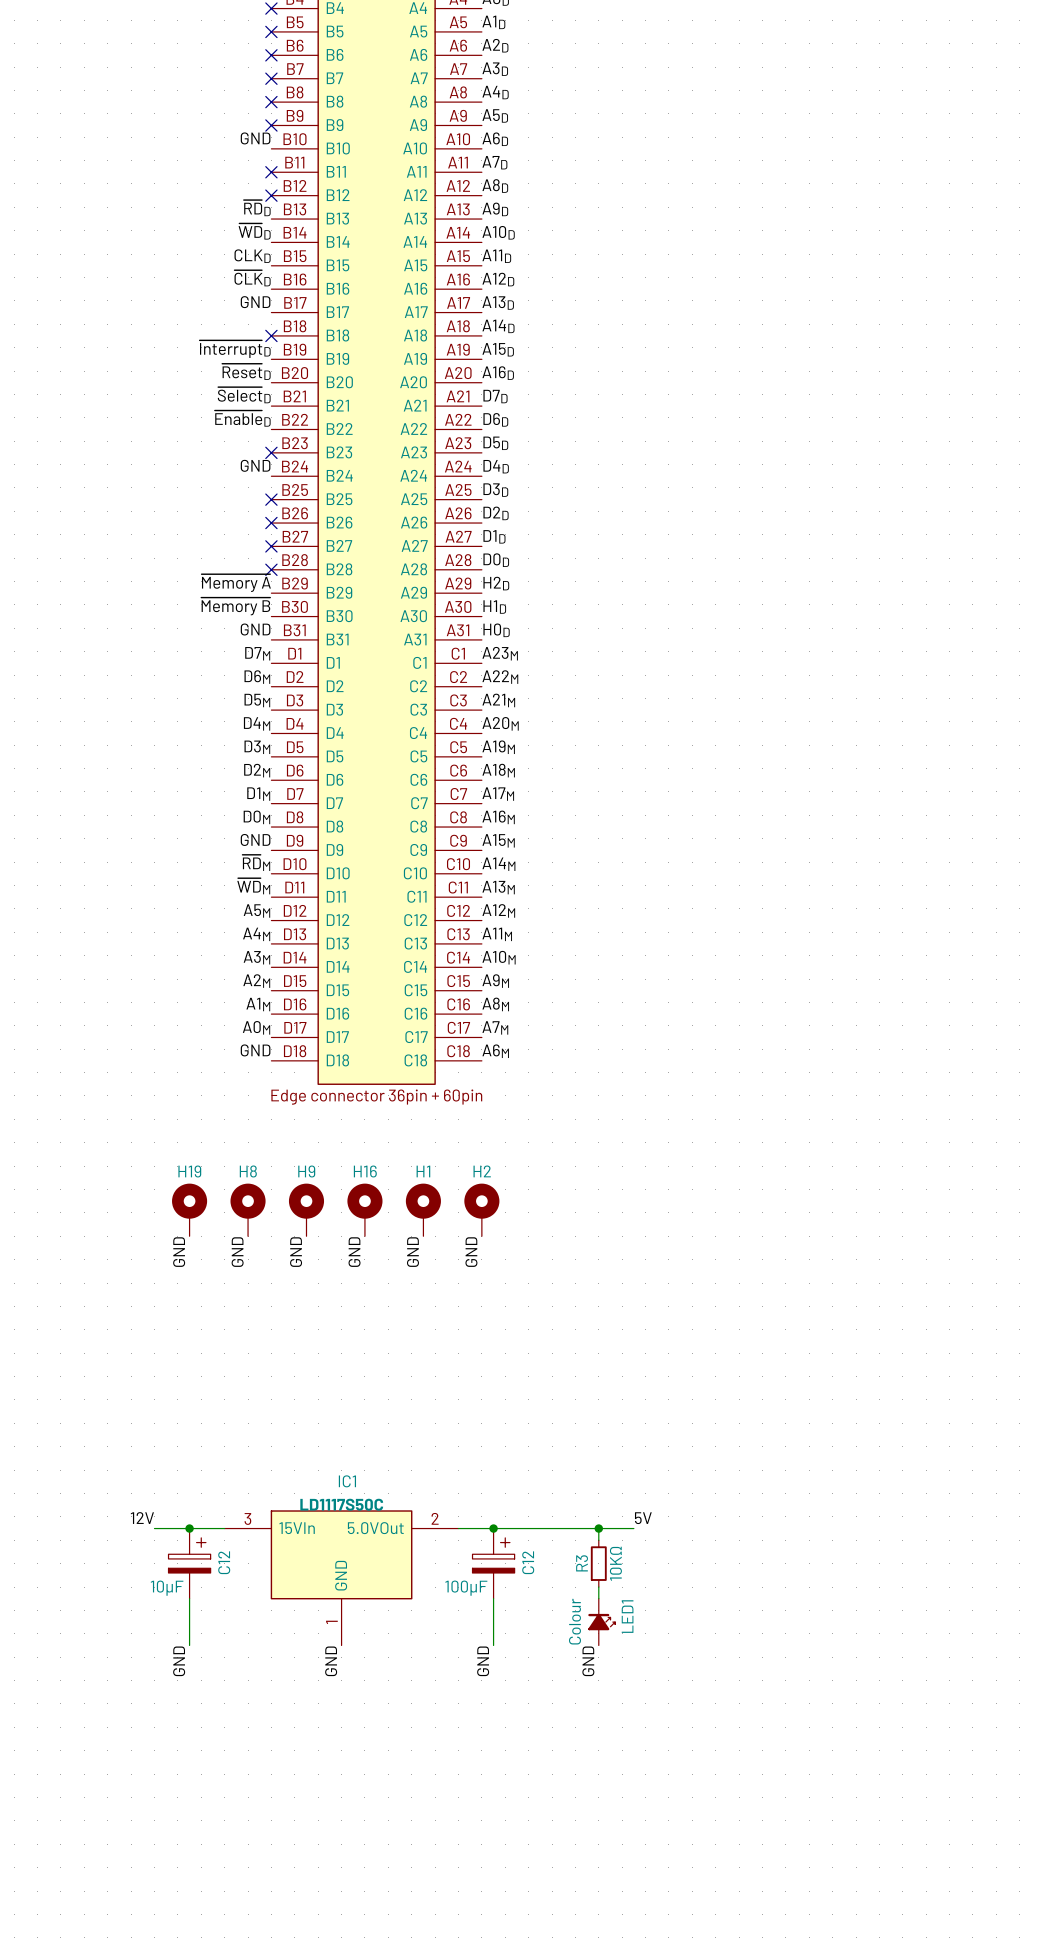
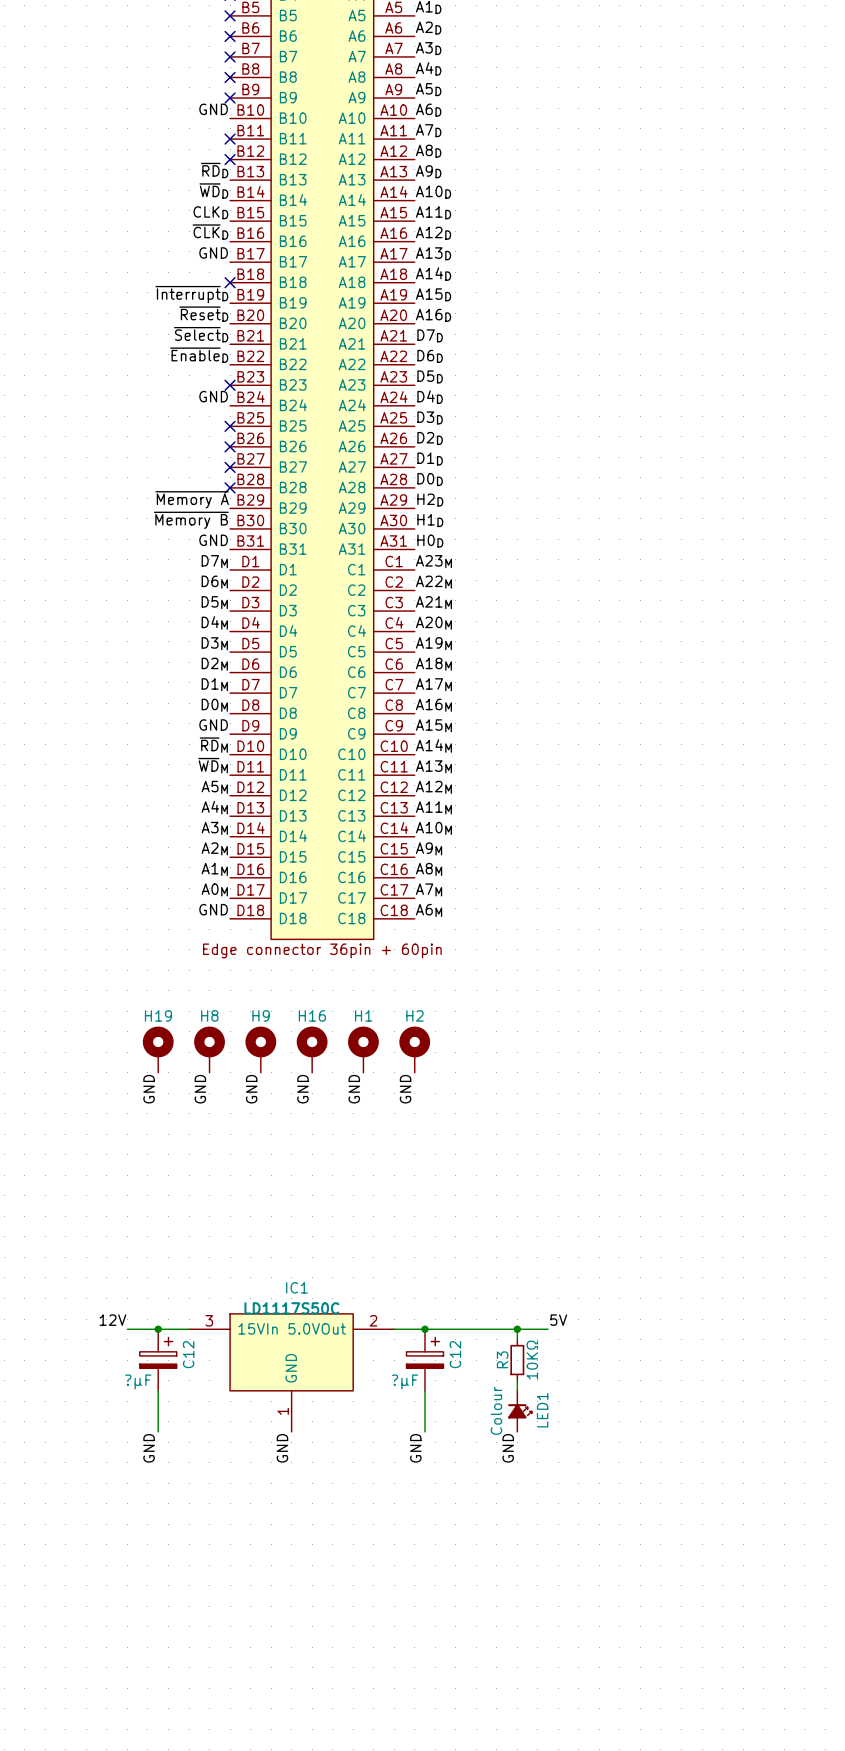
C12 text: 10μF (167, 1588) -> ?μF (138, 1381)
C12 text: 100μF (466, 1588) -> ?μF (405, 1381)

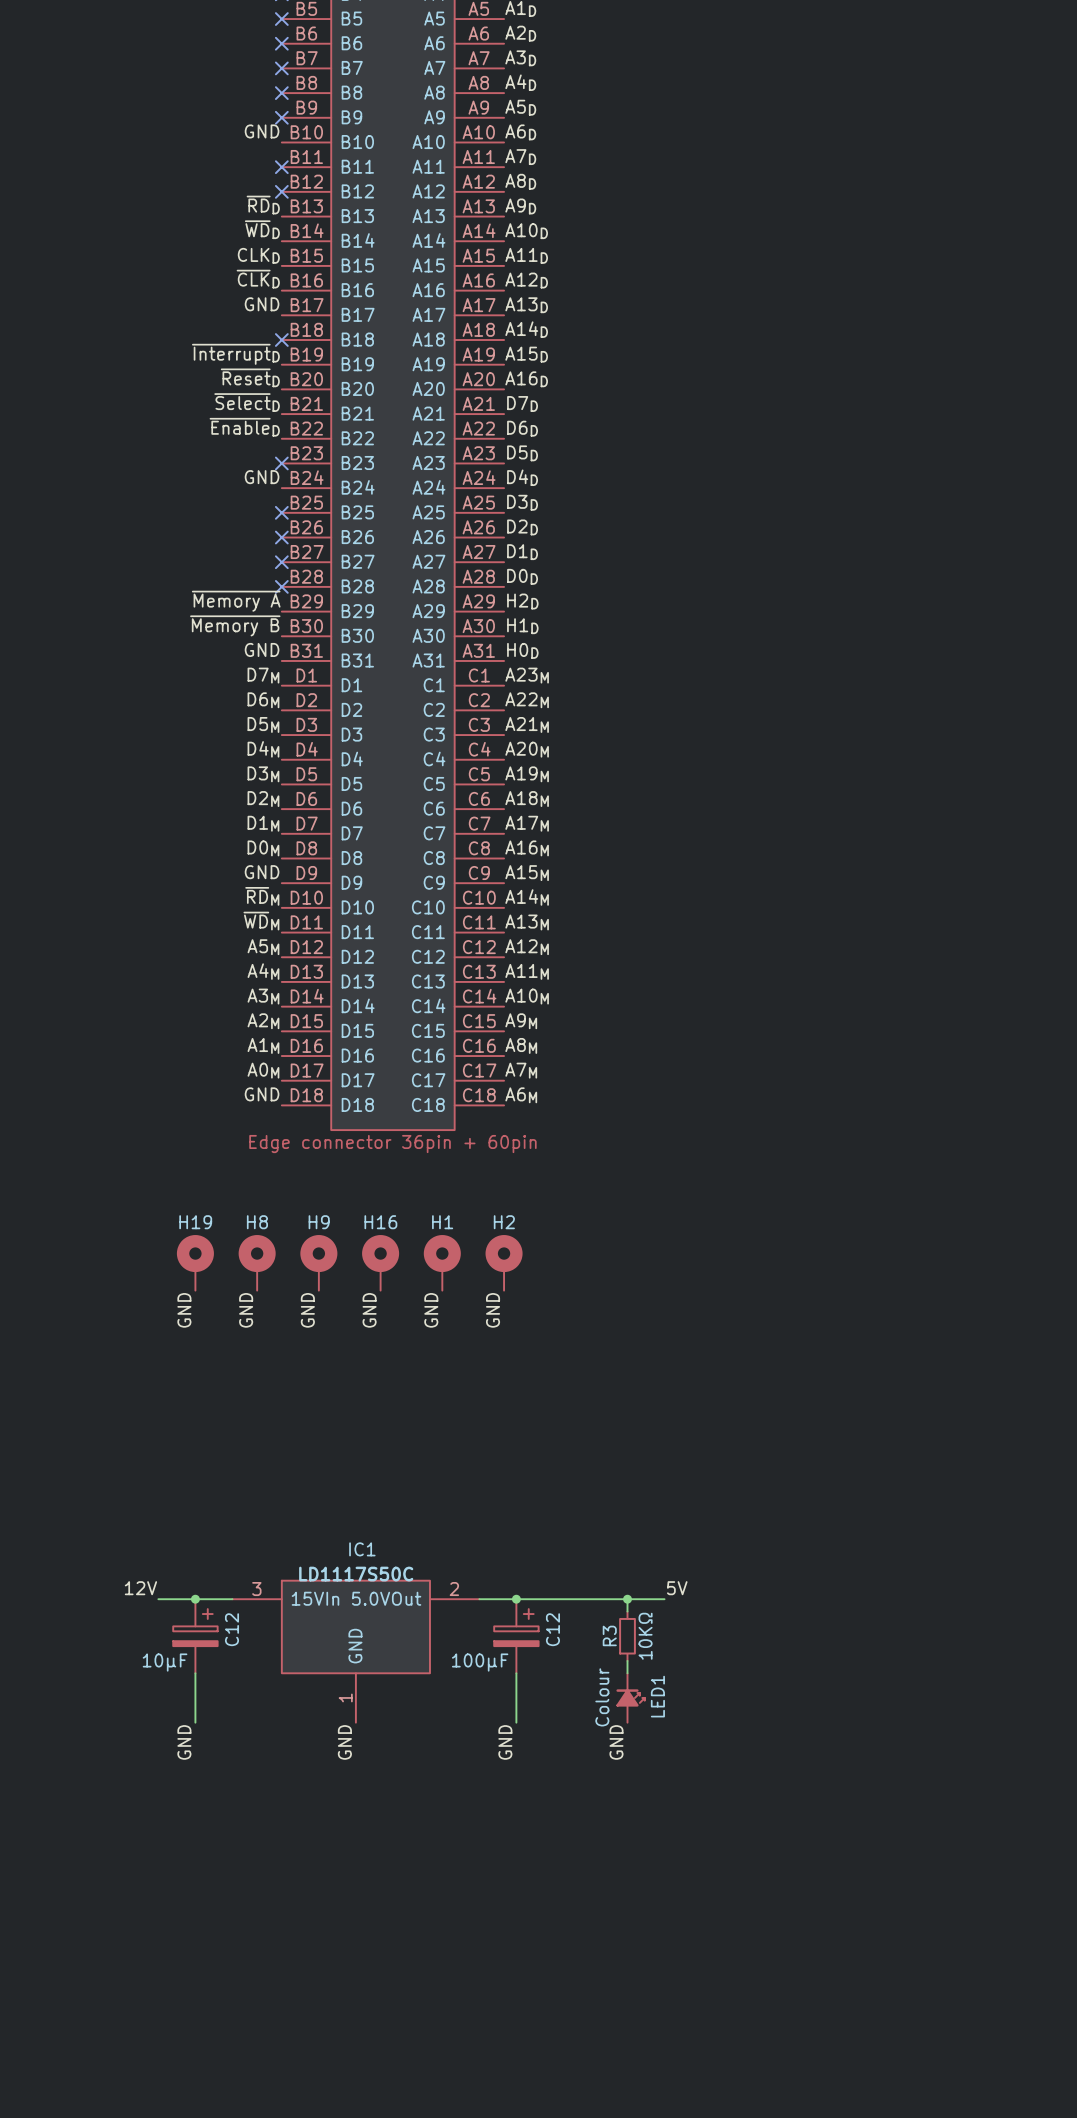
C12 text: ?μF (138, 1381) -> 10μF (165, 1662)
C12 text: ?μF (405, 1381) -> 100μF (480, 1662)

